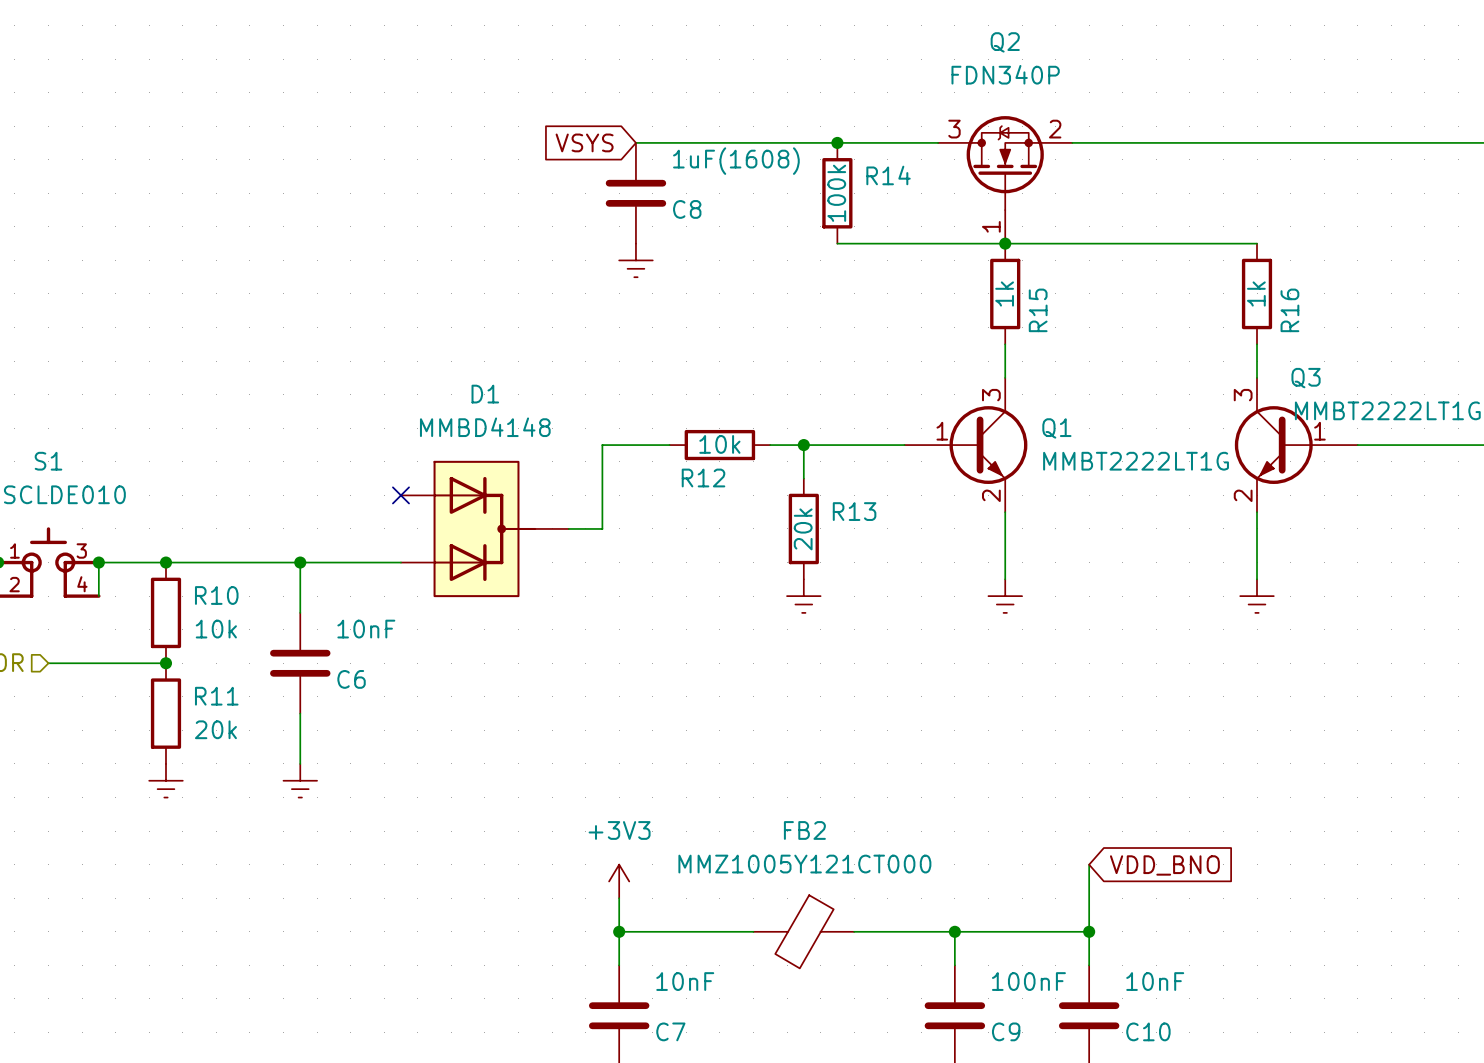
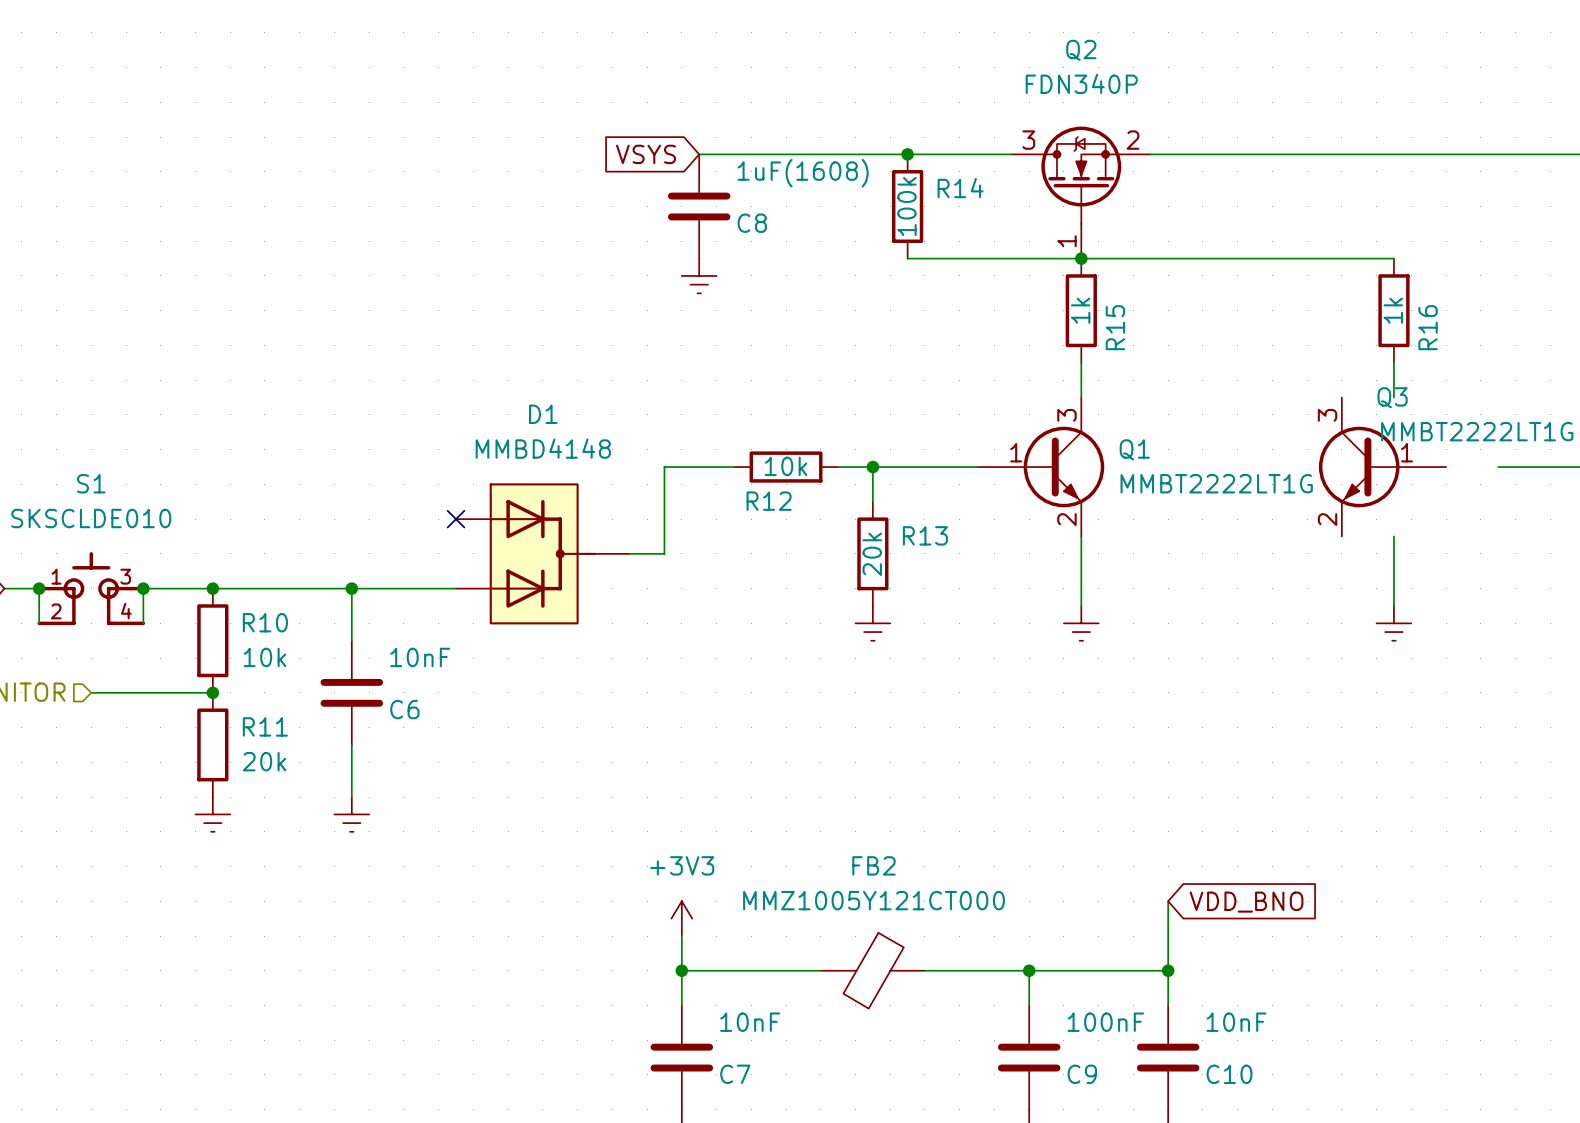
R16 position: (1257, 293) -> (1393, 310)
wire: (1257, 344) (1257, 377) -> (1393, 362) (1393, 397)
wire: (1357, 445) (1408, 445) -> (1341, 258) (1393, 258)
wire: (1257, 512) (1257, 579) -> (1393, 536) (1393, 605)
power symbol position: (1257, 596) -> (1393, 623)

